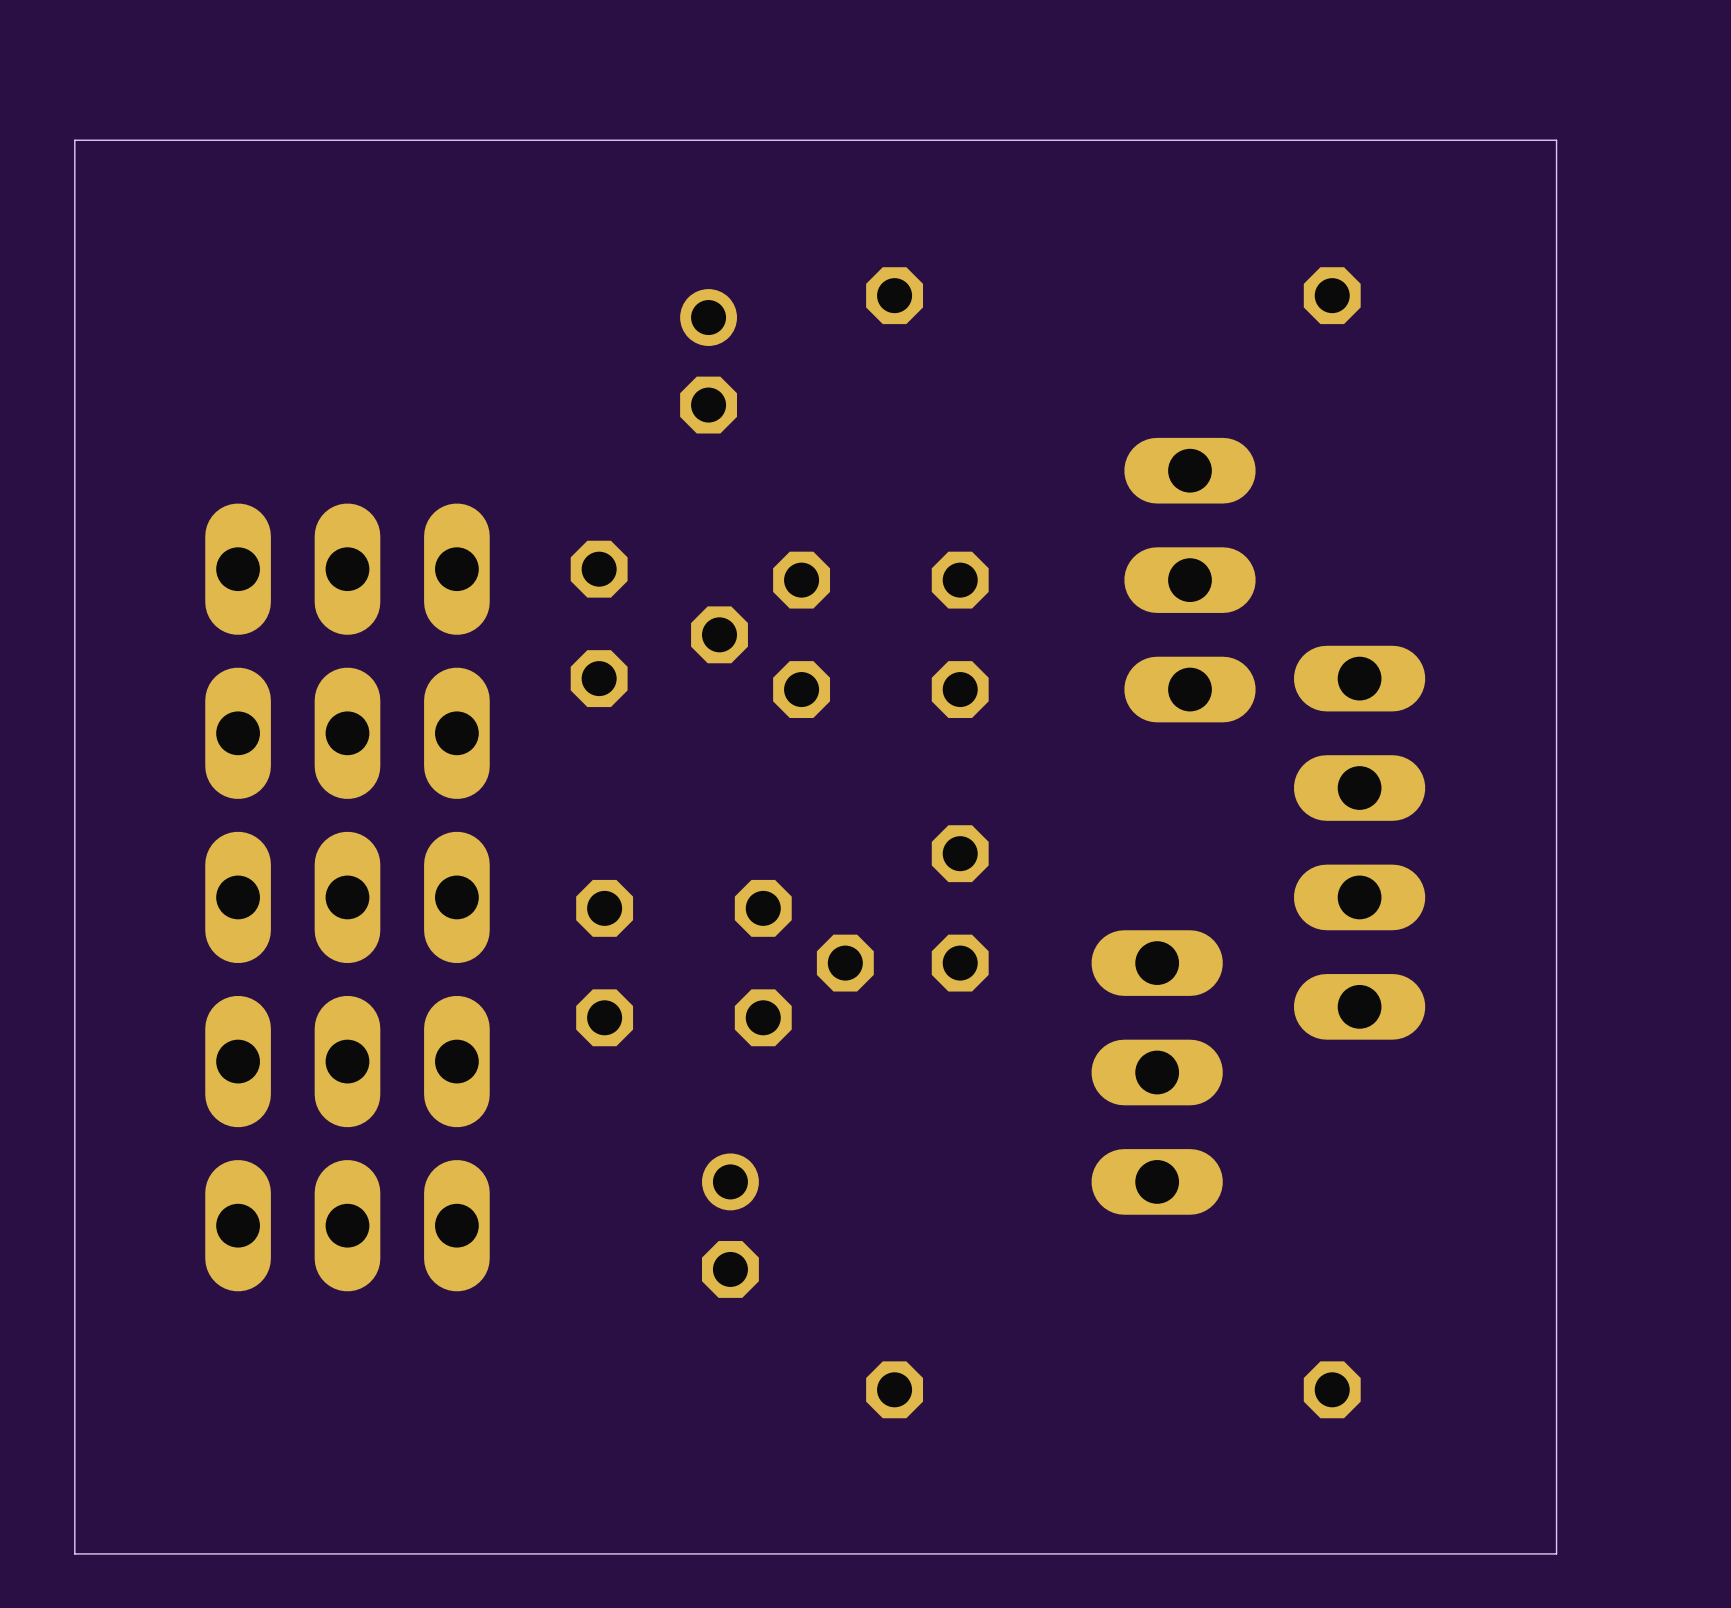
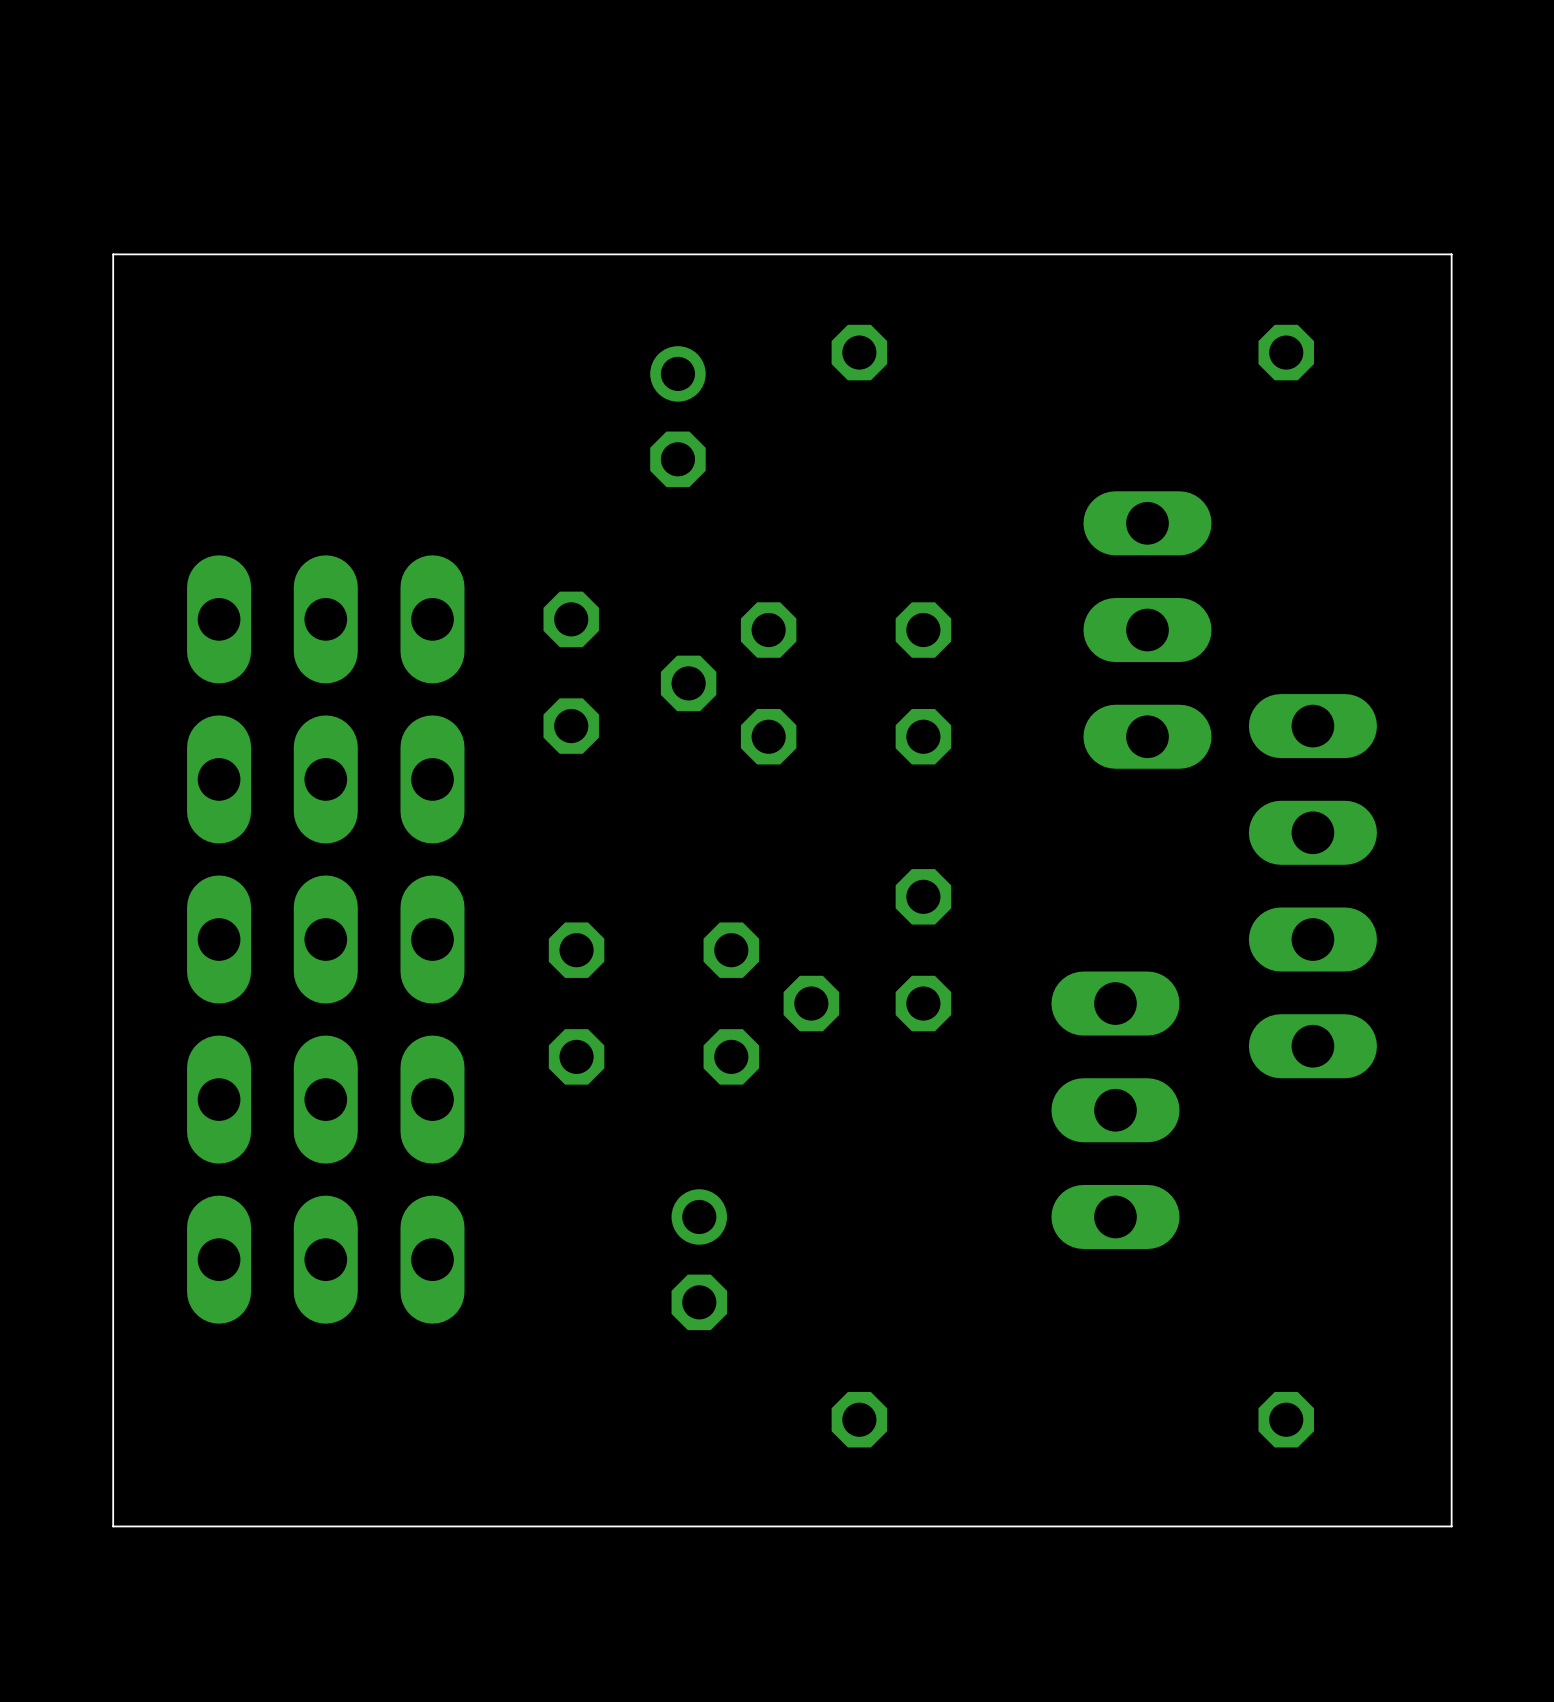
board edge: (1556, 140) (74, 140) (74, 1553) (1556, 1553) (1556, 140) -> (1451, 254) (1451, 1526) (113, 1526) (113, 254) (1451, 254)

